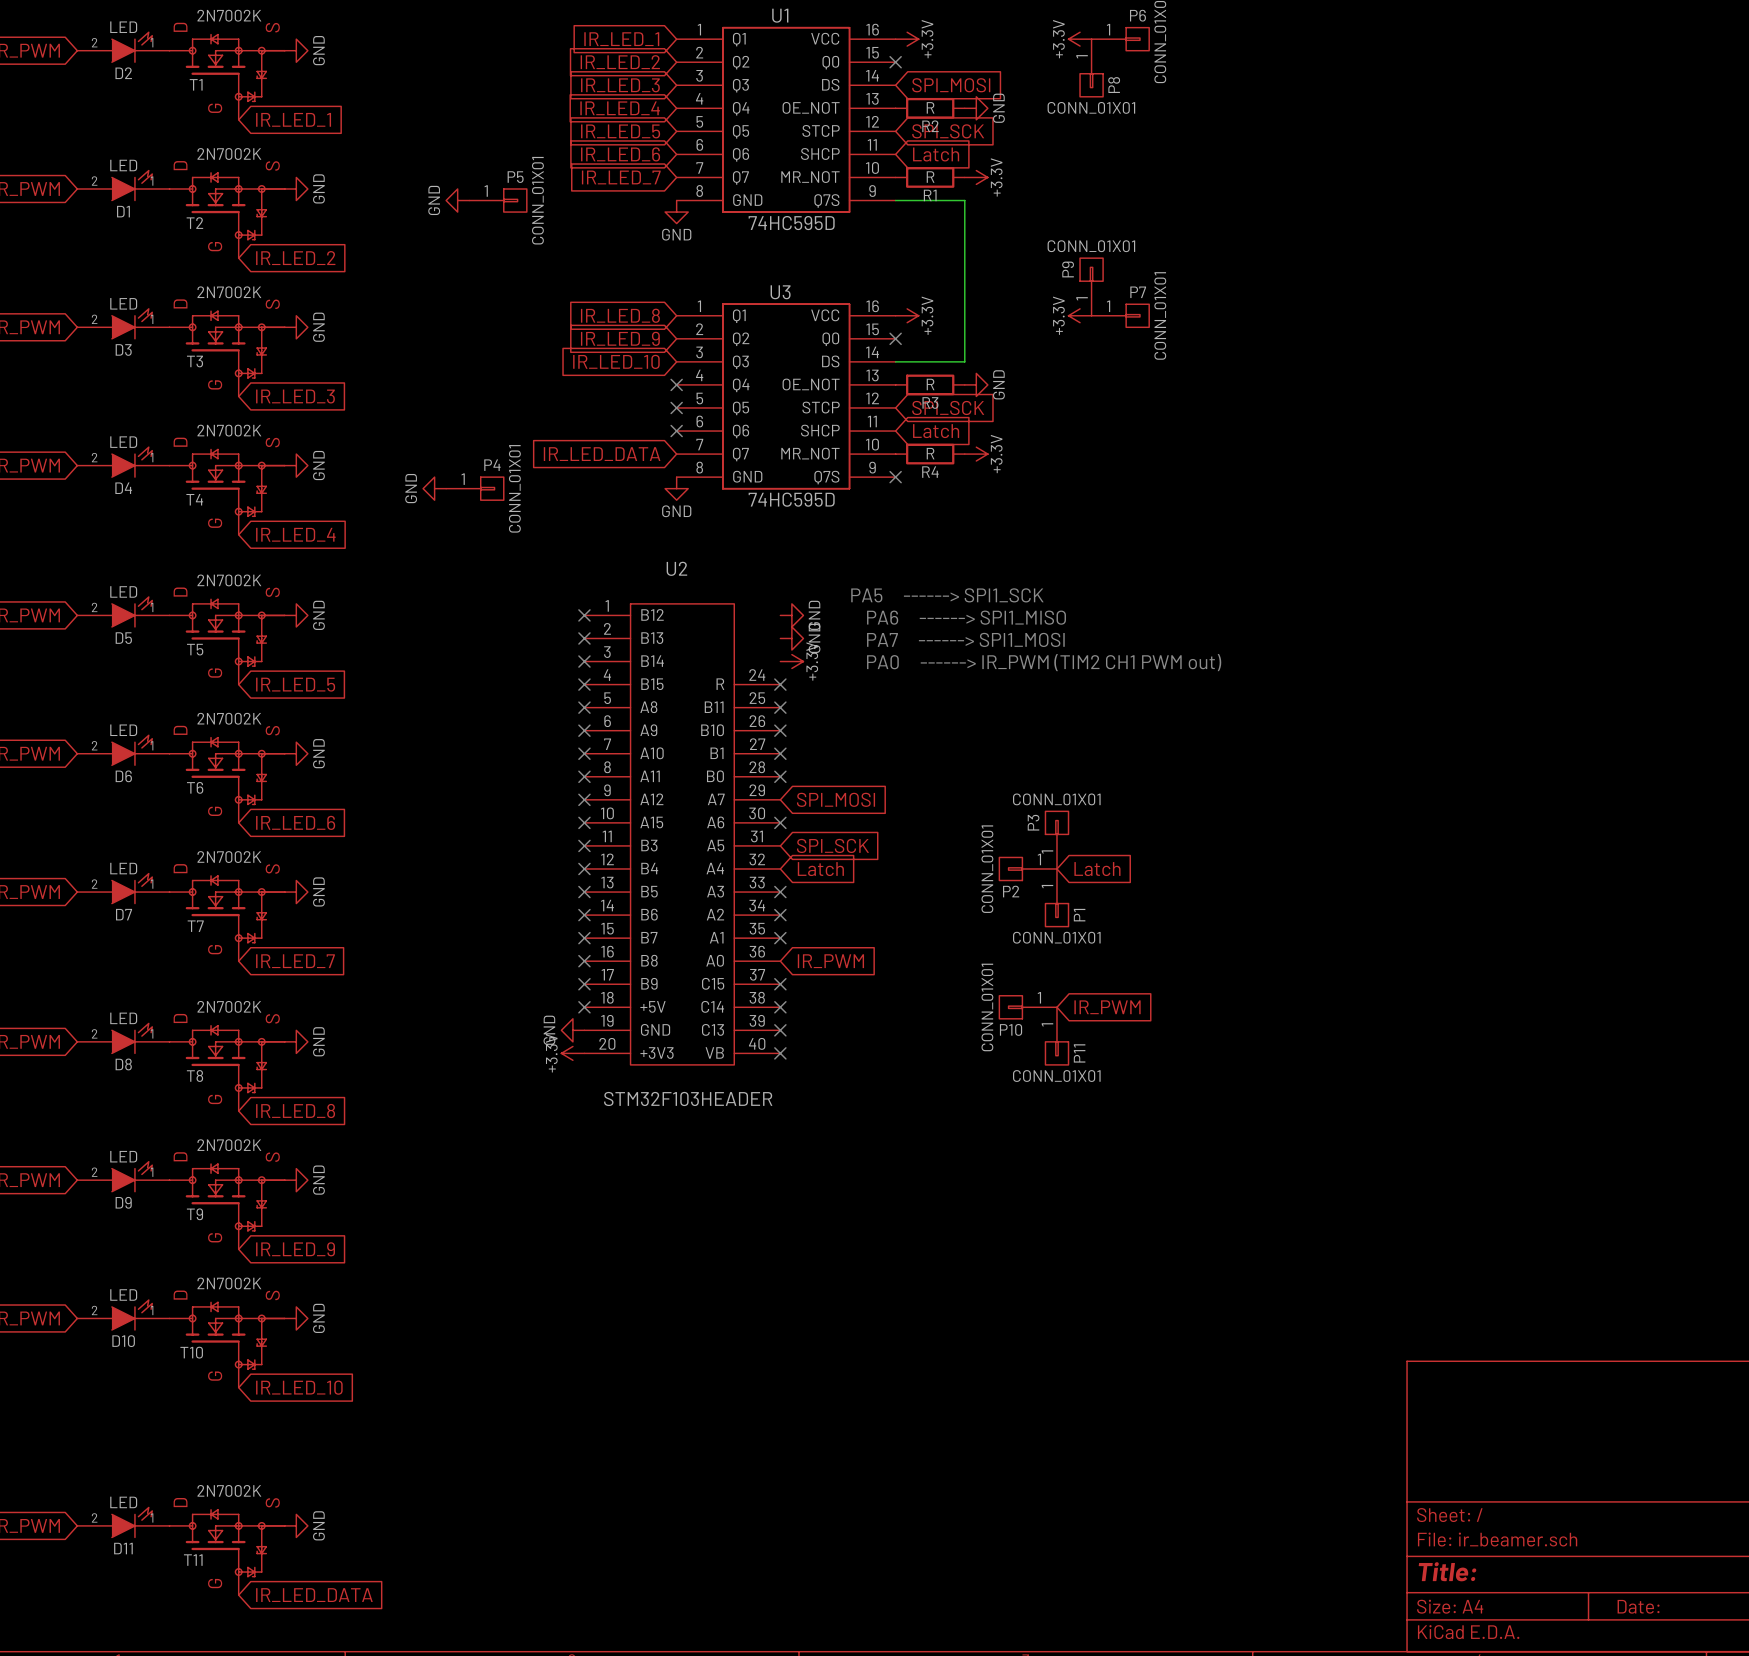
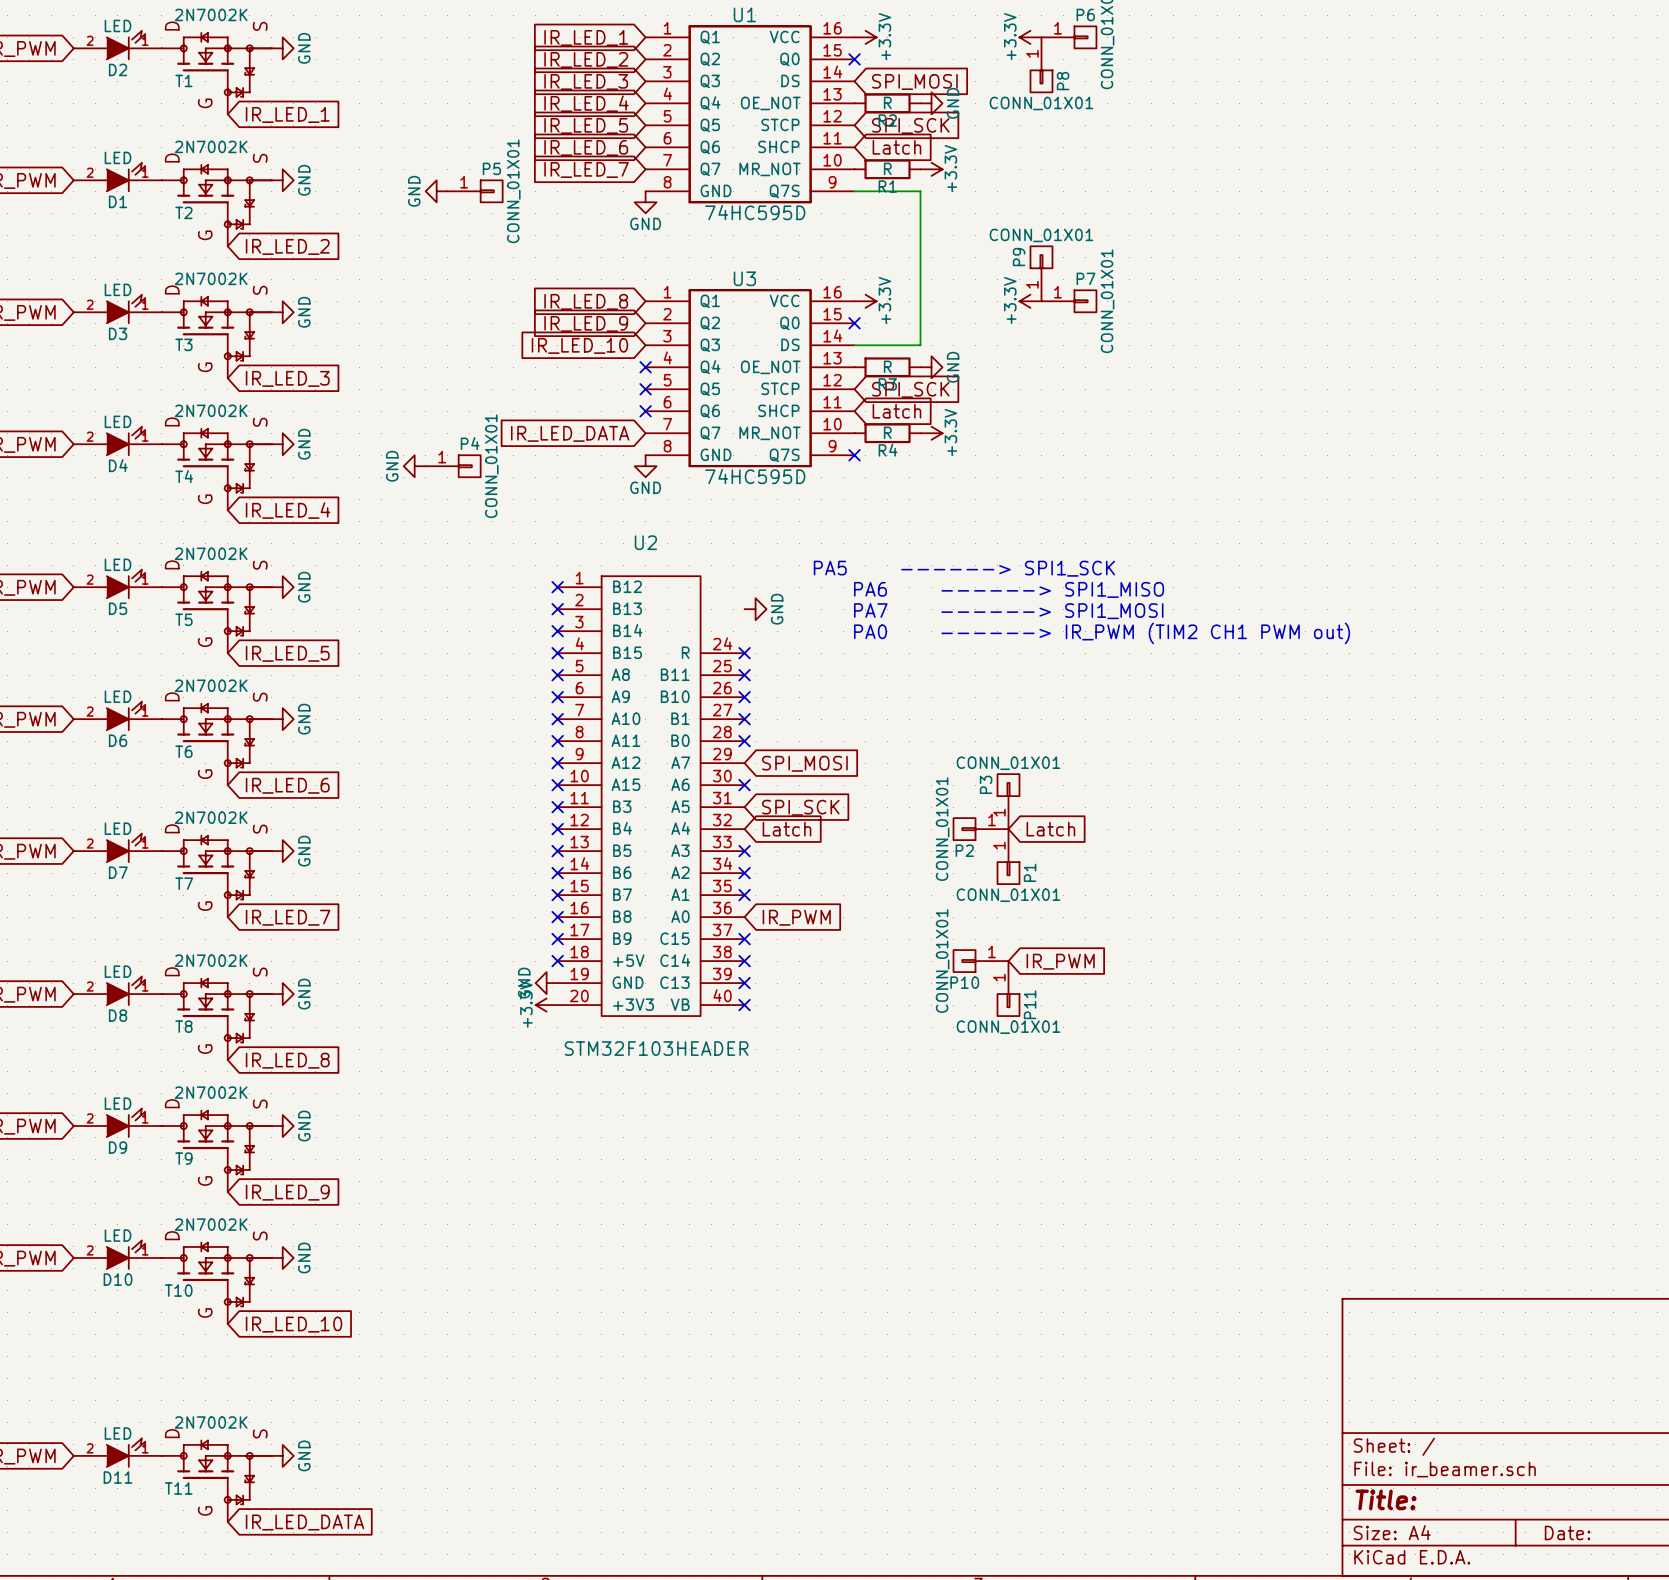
power symbol: GND (791, 615) -> none
power symbol: +3.3V (791, 661) -> none

